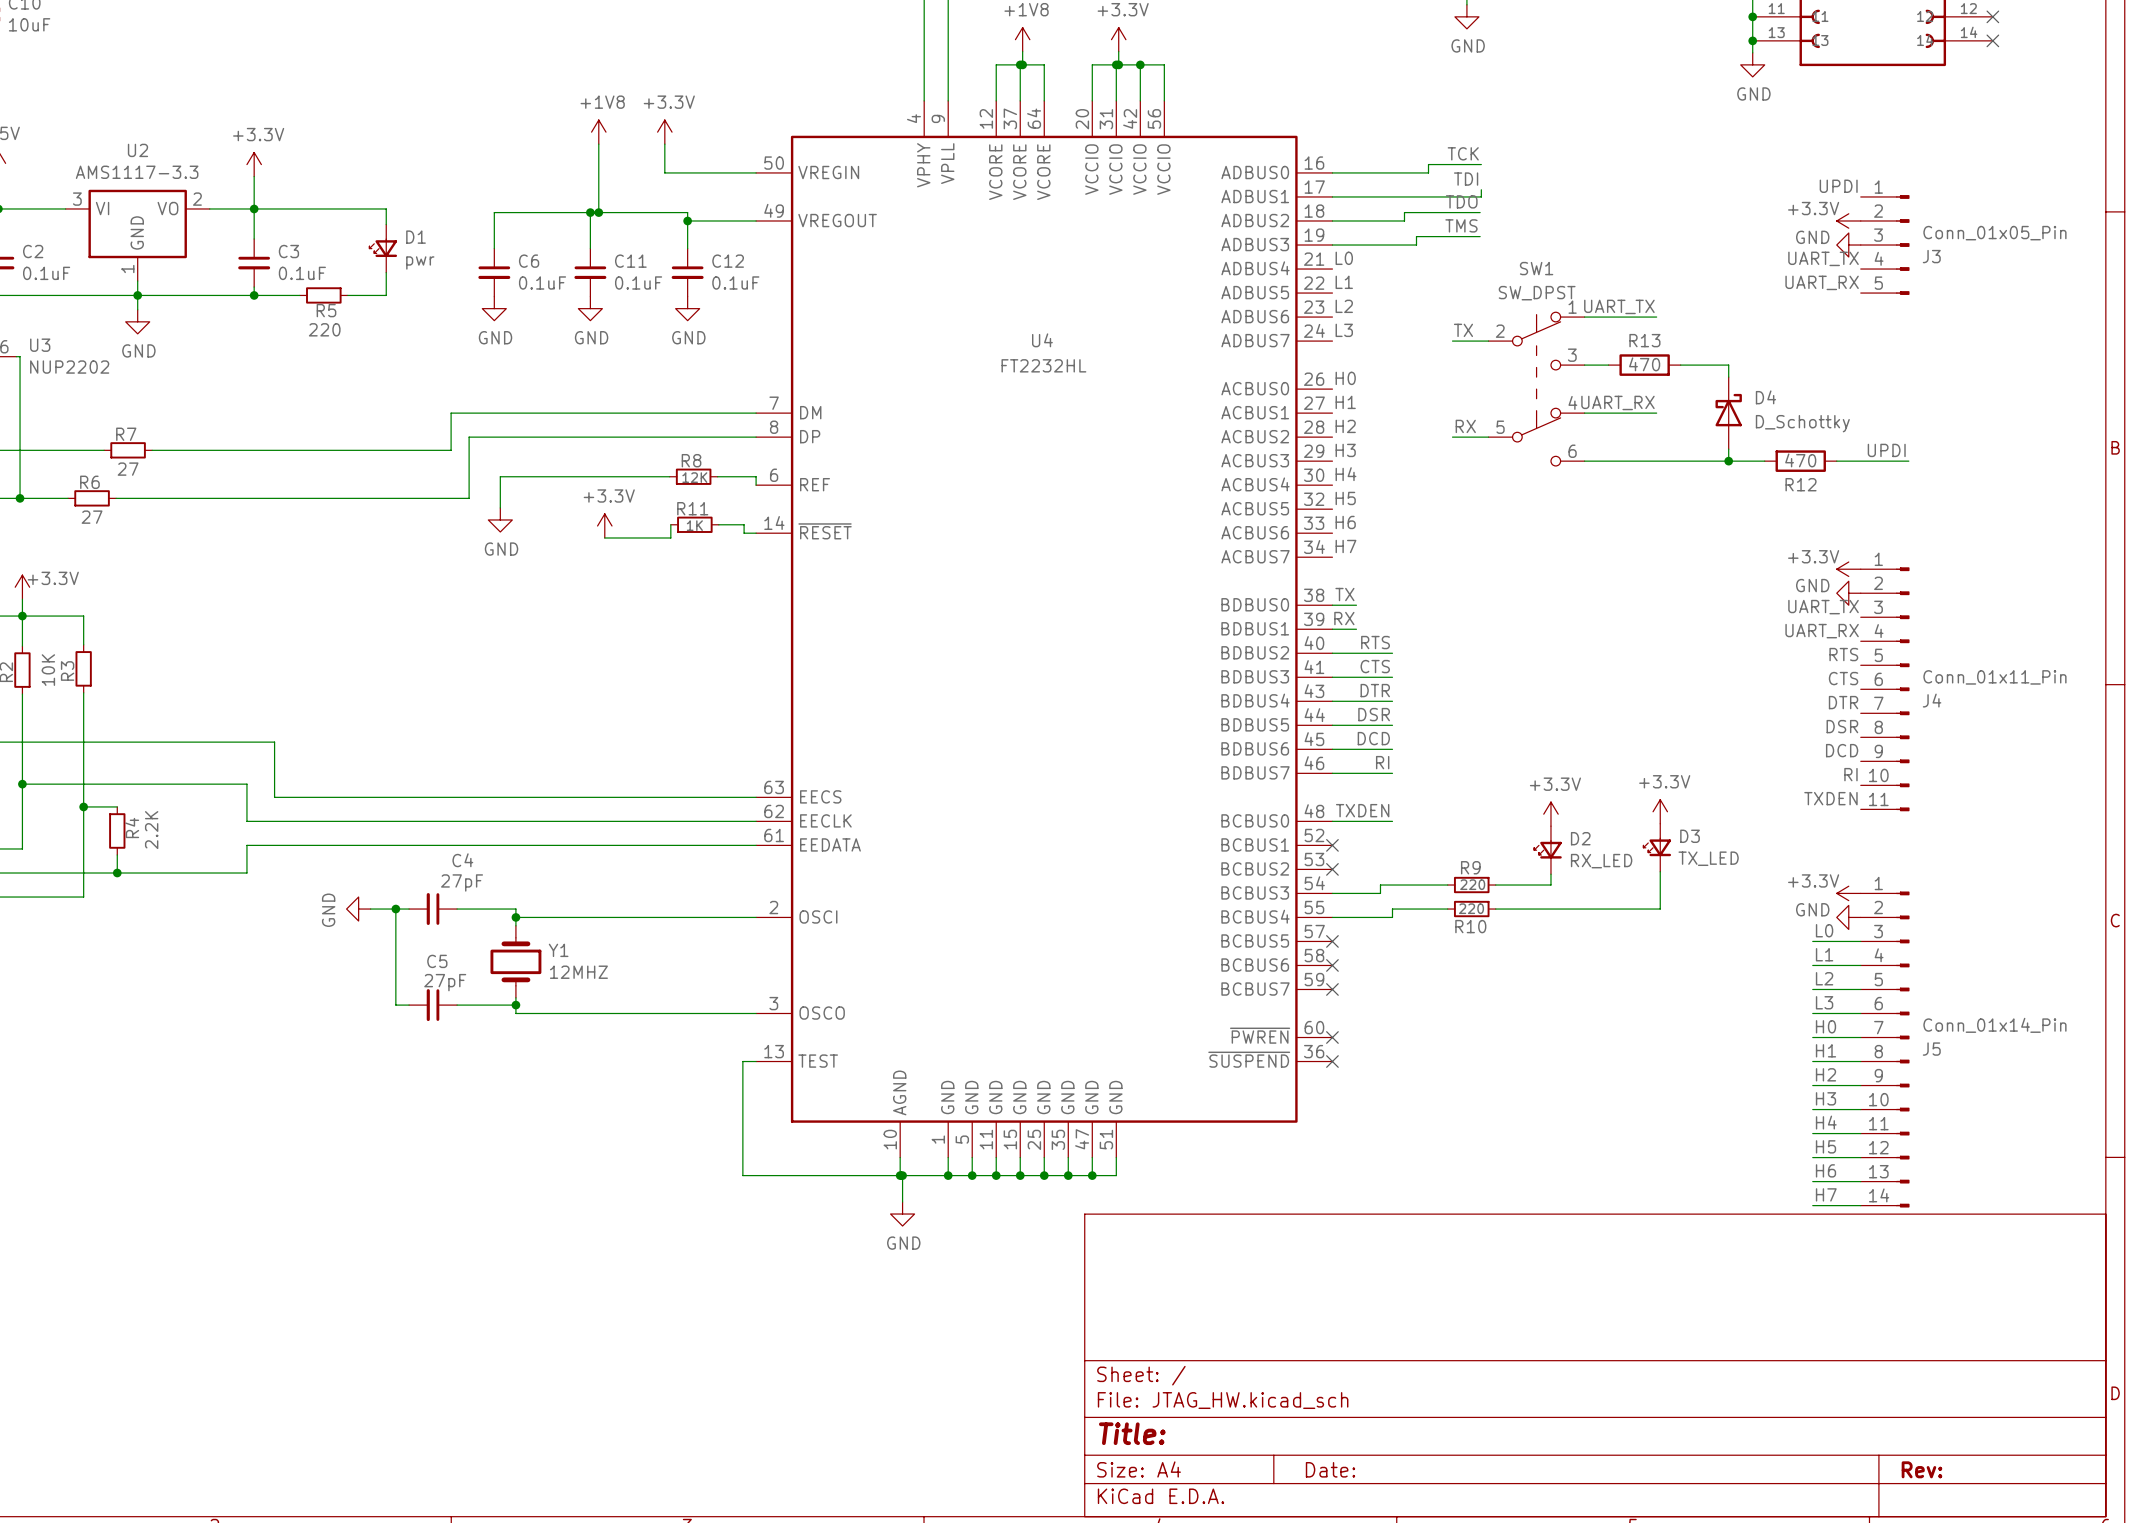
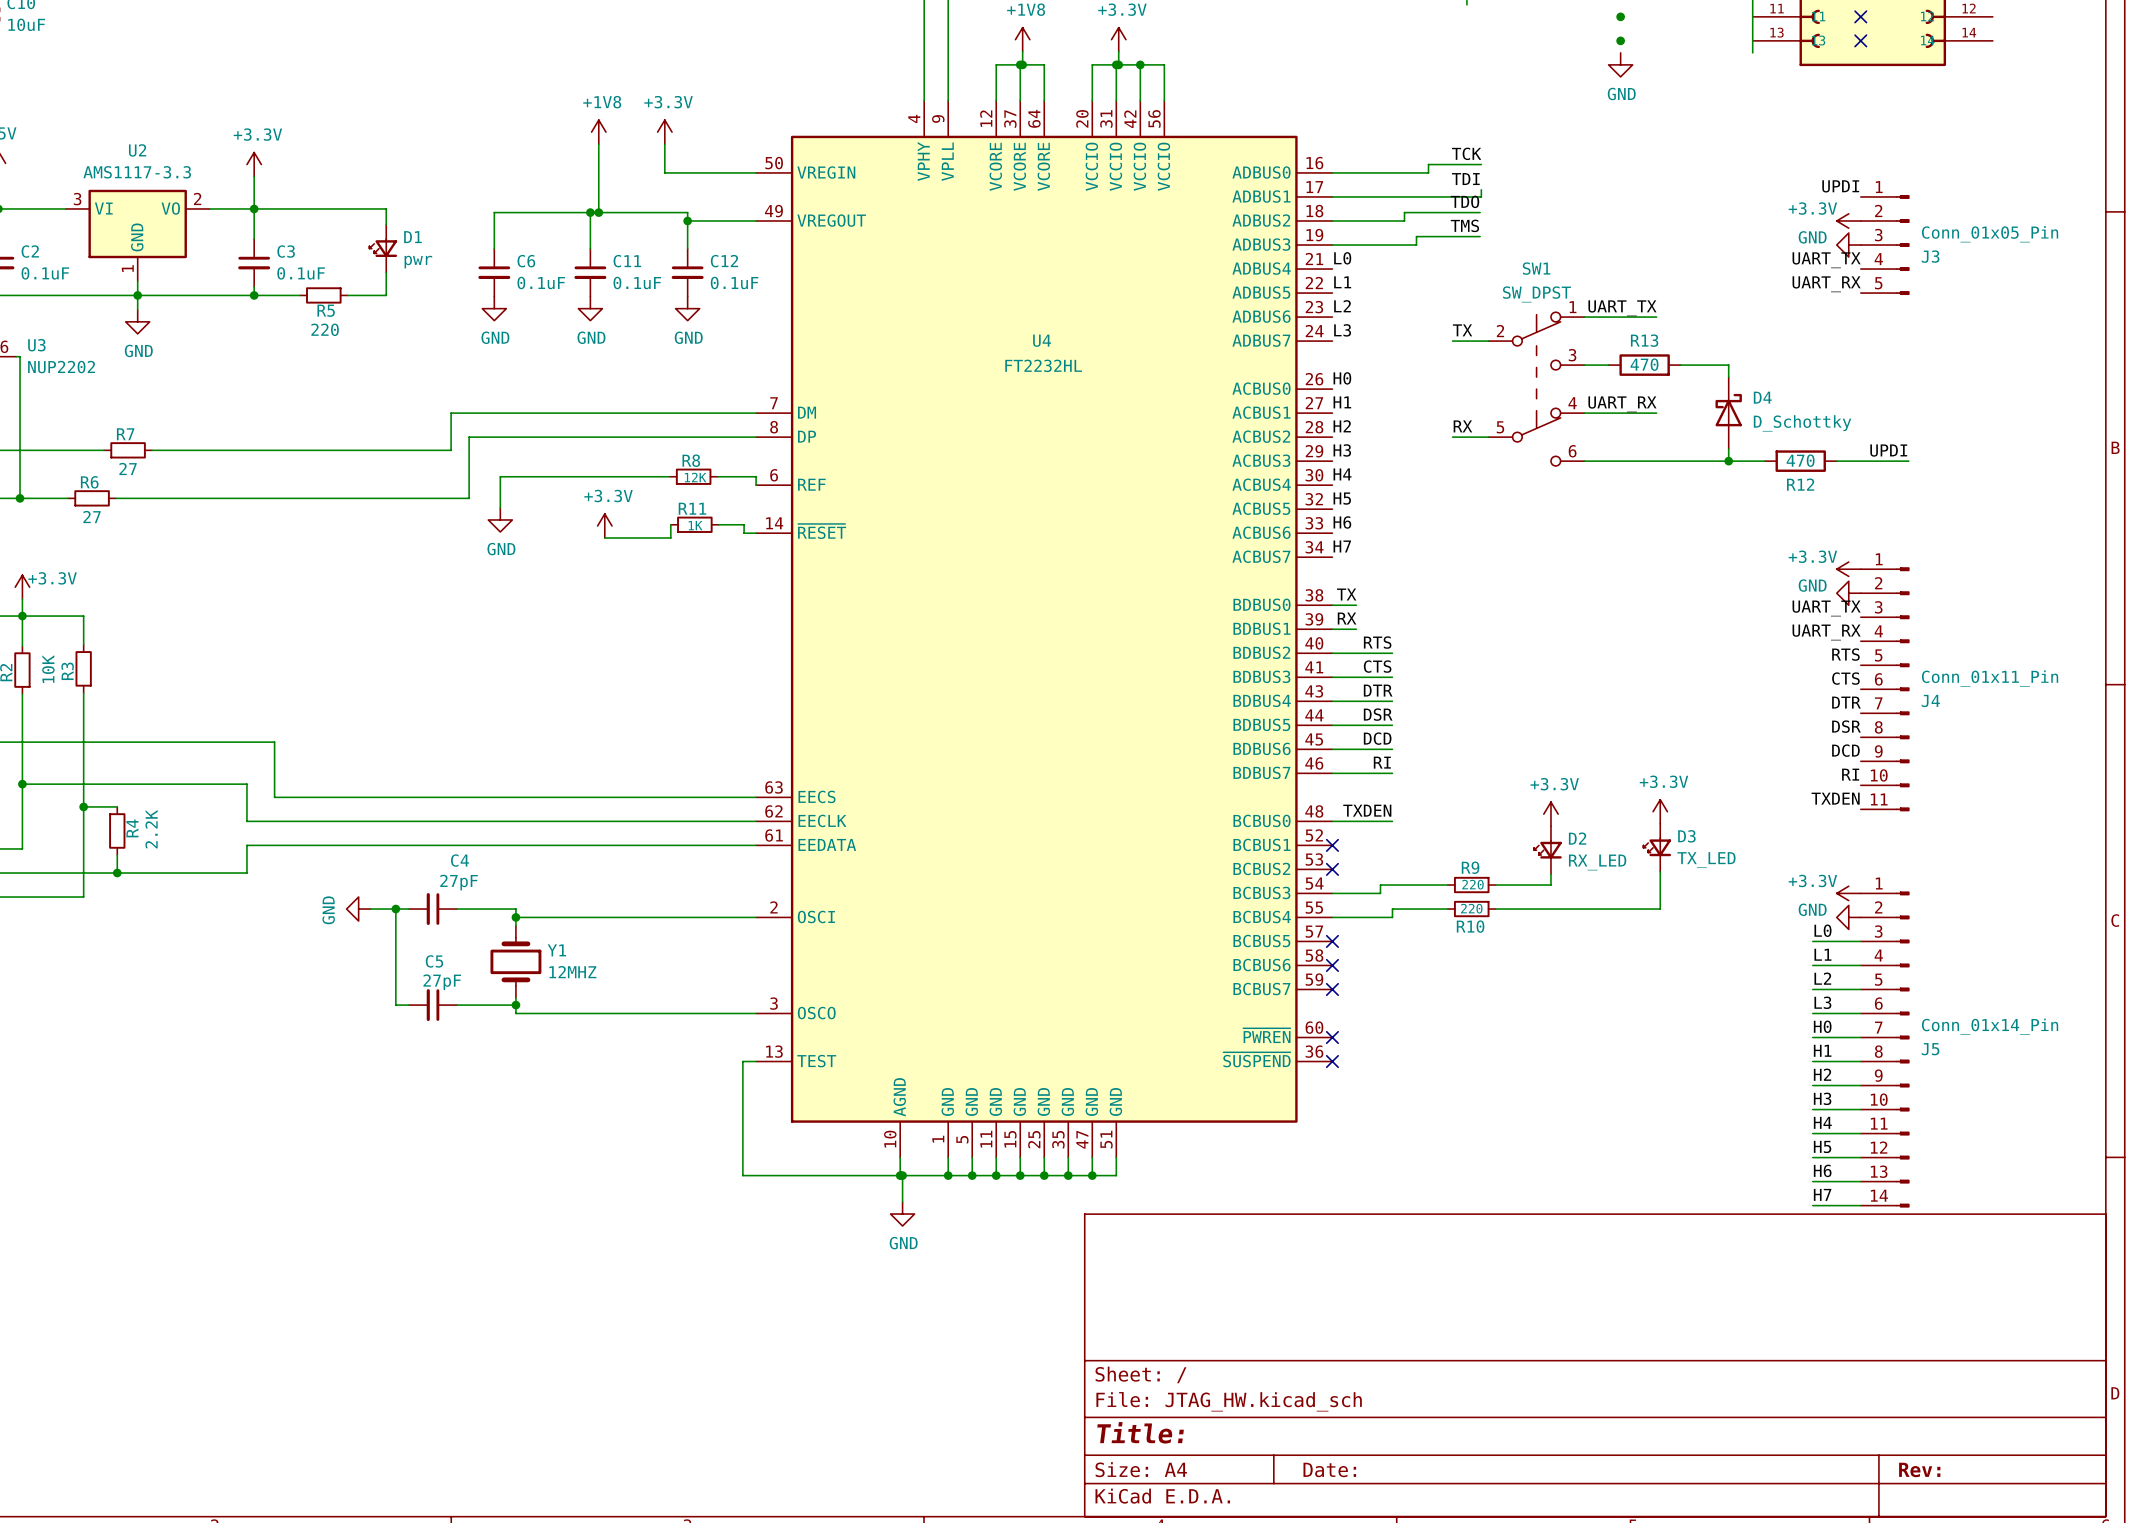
power symbol: GND (1466, 16) -> none
junction: none -> (1620, 16)
junction: (1752, 16) -> none
no-connect mark: none -> (1860, 16)
no-connect mark: (1992, 16) -> none
junction: none -> (1620, 40)
junction: (1752, 40) -> none
no-connect mark: none -> (1860, 40)
no-connect mark: (1992, 40) -> none
power symbol: none -> GND (1620, 64)
power symbol: GND (1752, 64) -> none

